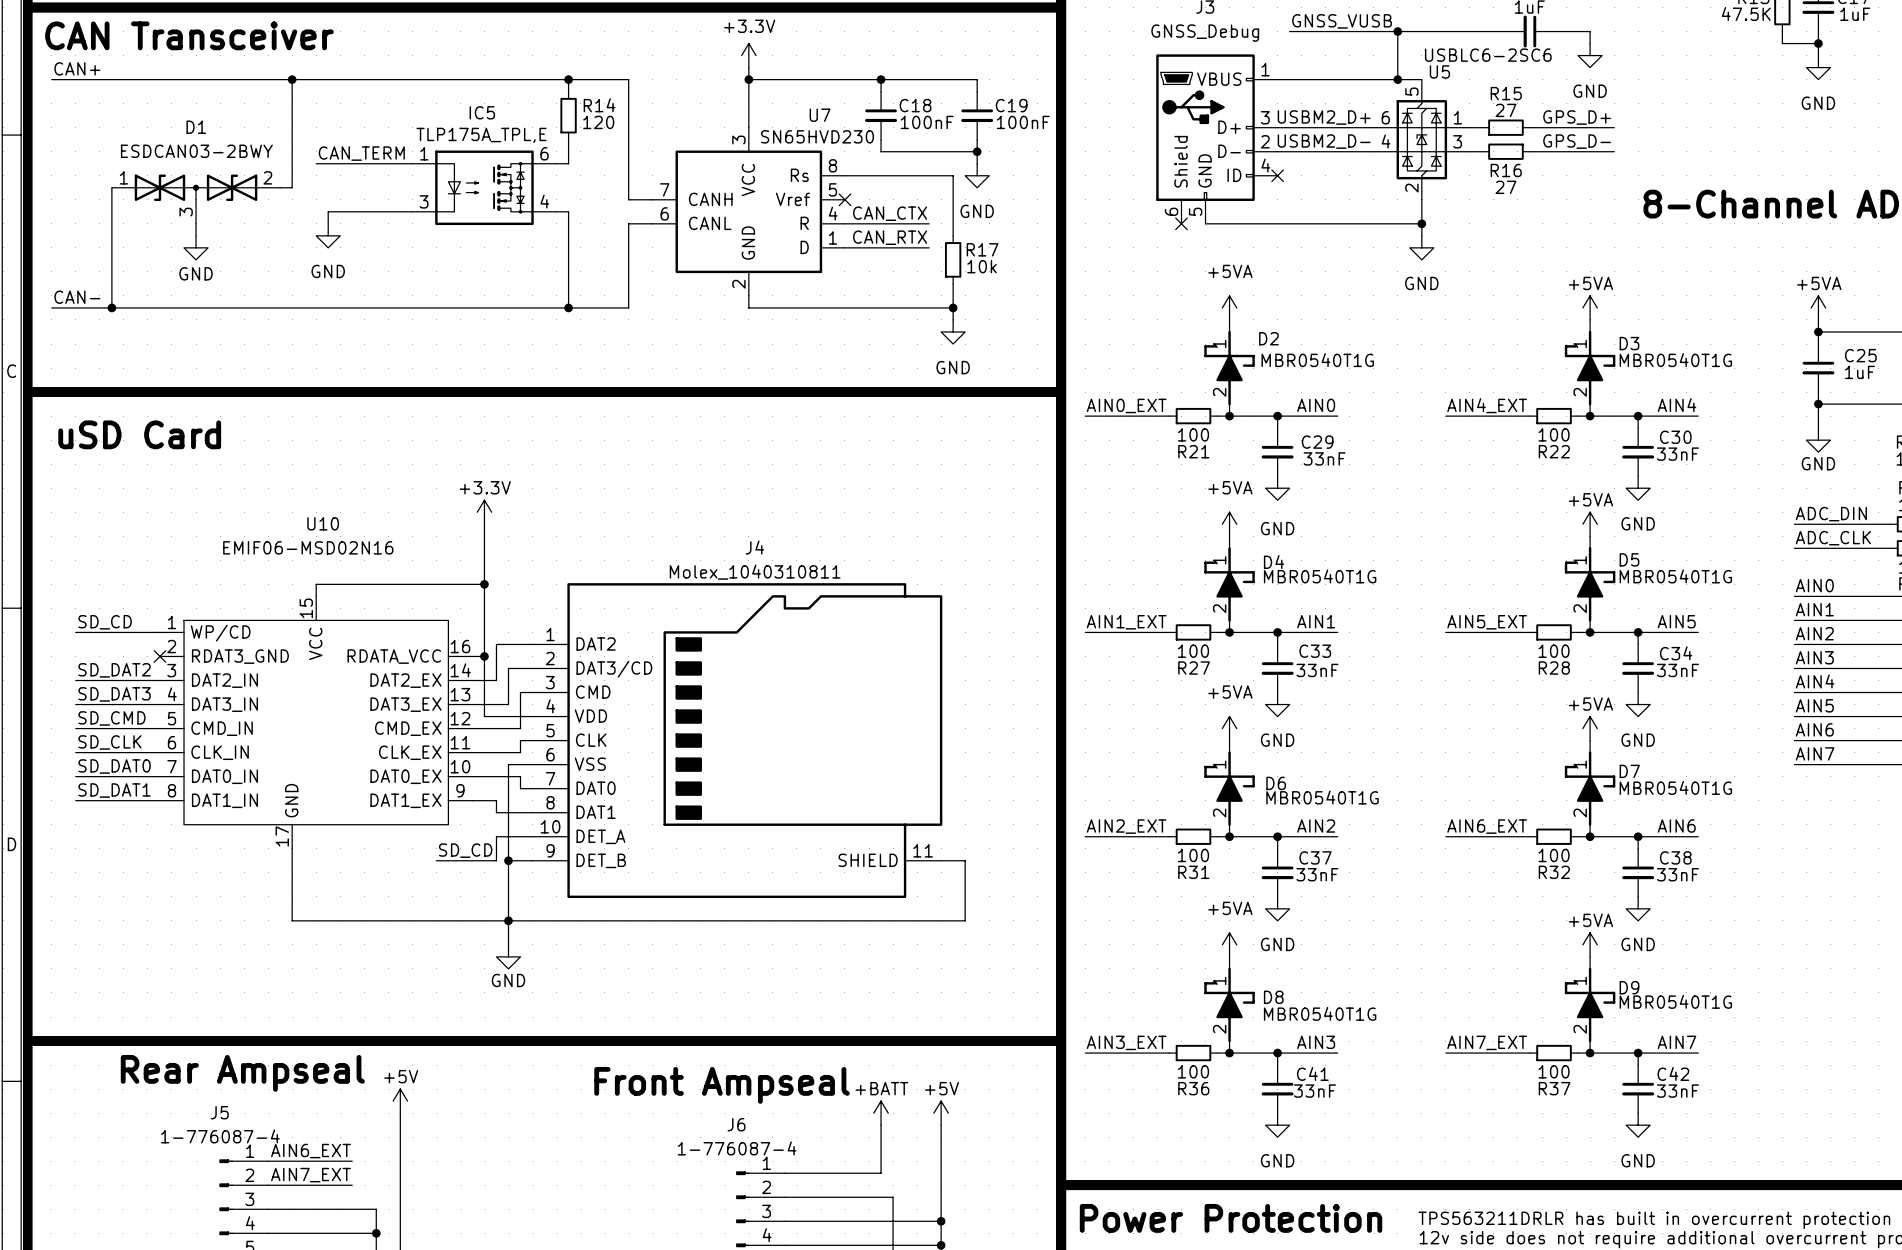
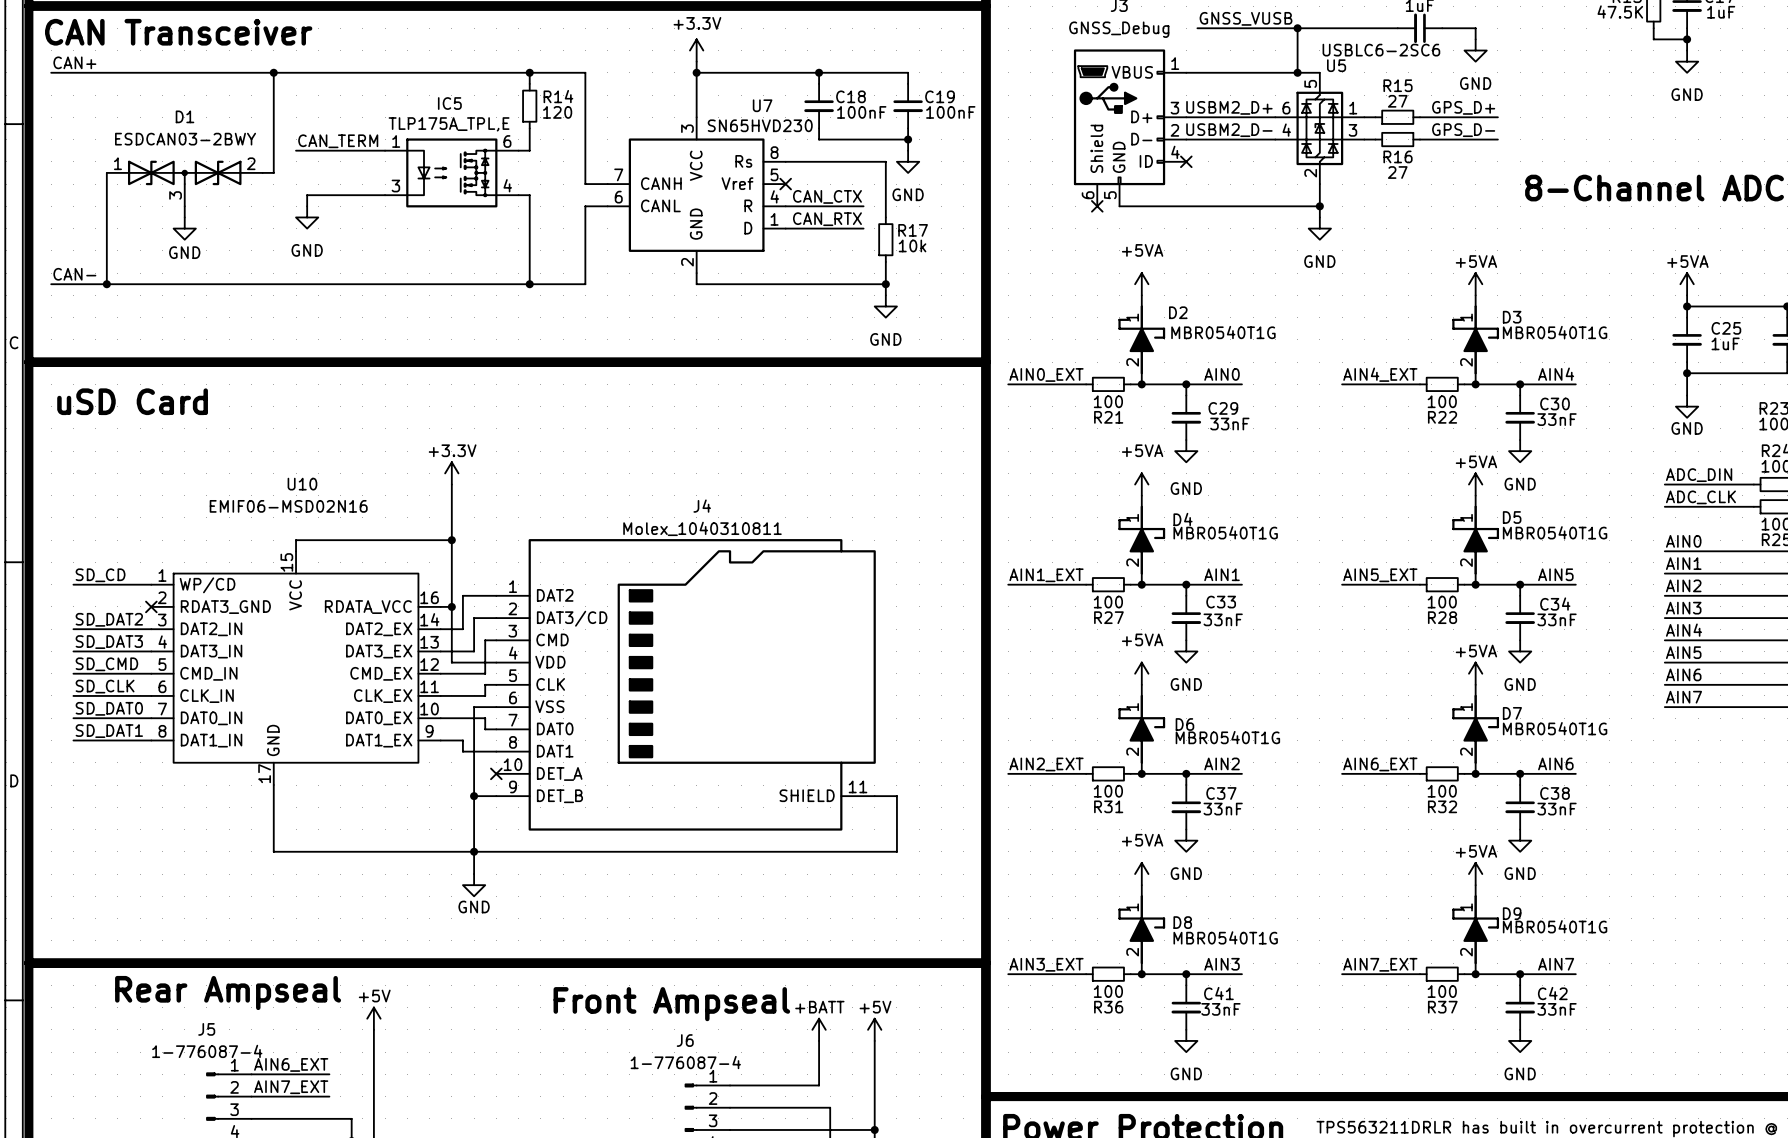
wire: (532, 836) (496, 836) (496, 860) (436, 860) -> none
no-connect mark: none -> (496, 773)
label: SD_CD (465, 850) -> none

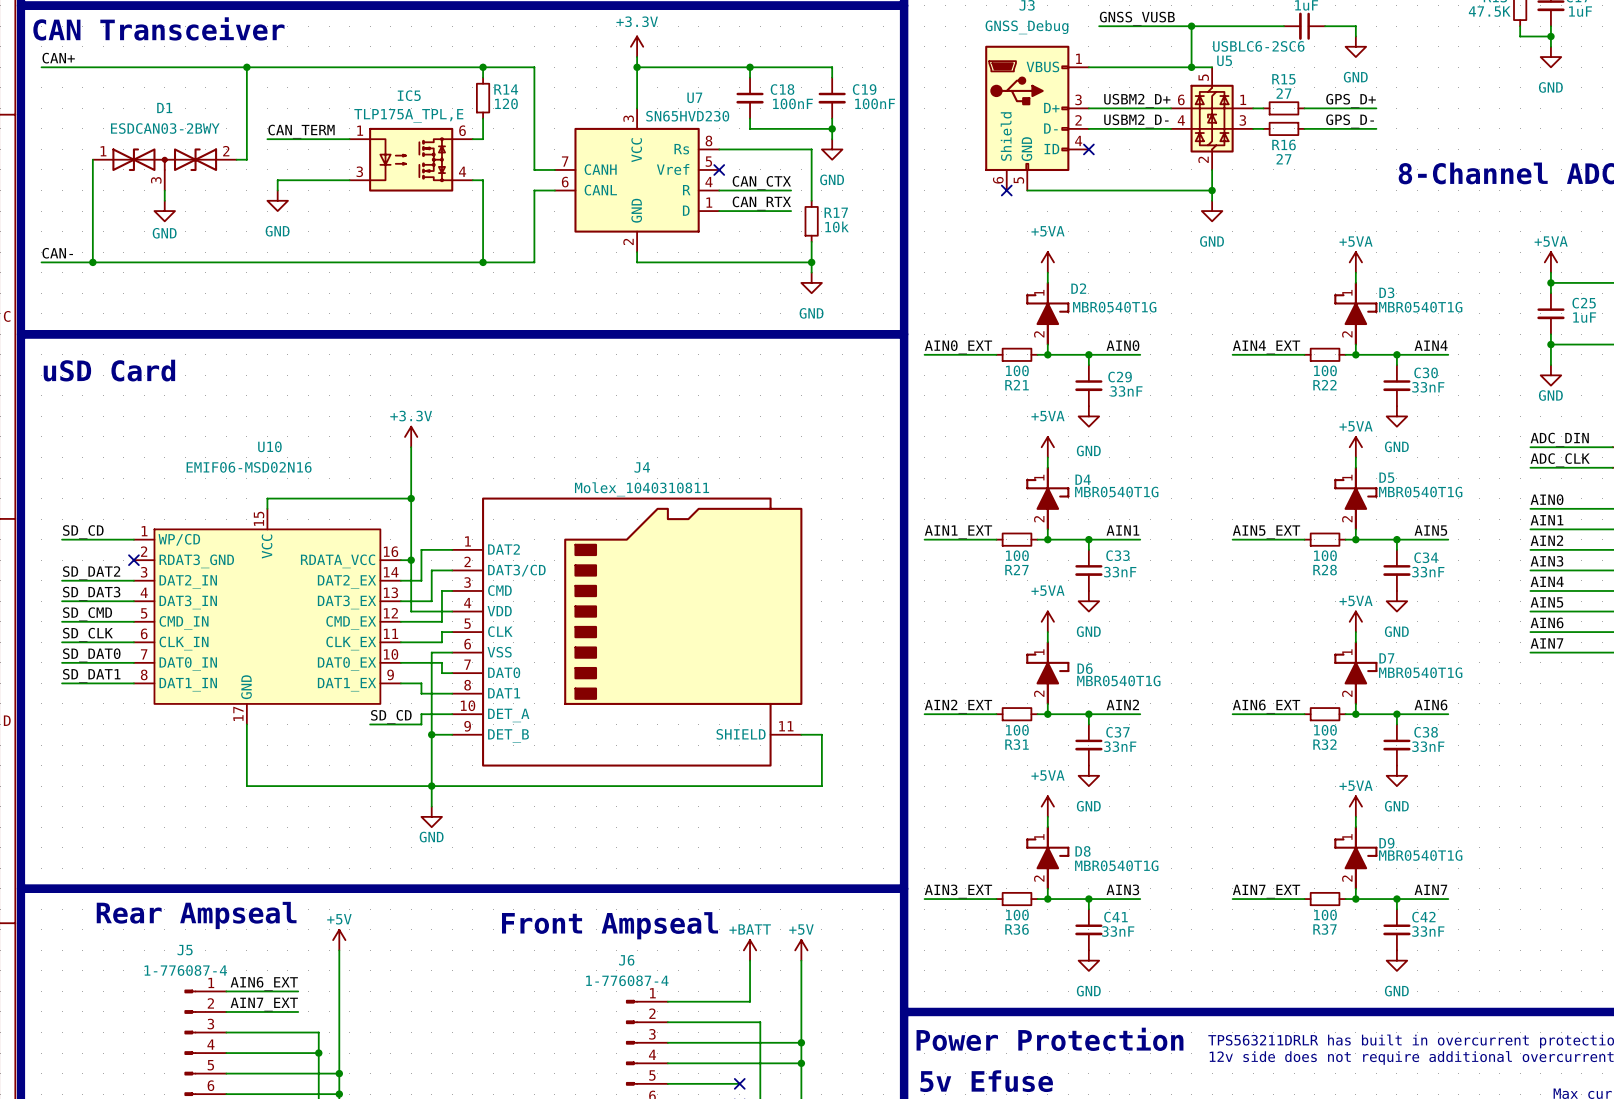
wire: none -> (452, 714) (421, 714) (421, 724) (370, 724)
no-connect mark: (496, 773) -> none
label: none -> SD_CD (391, 716)

